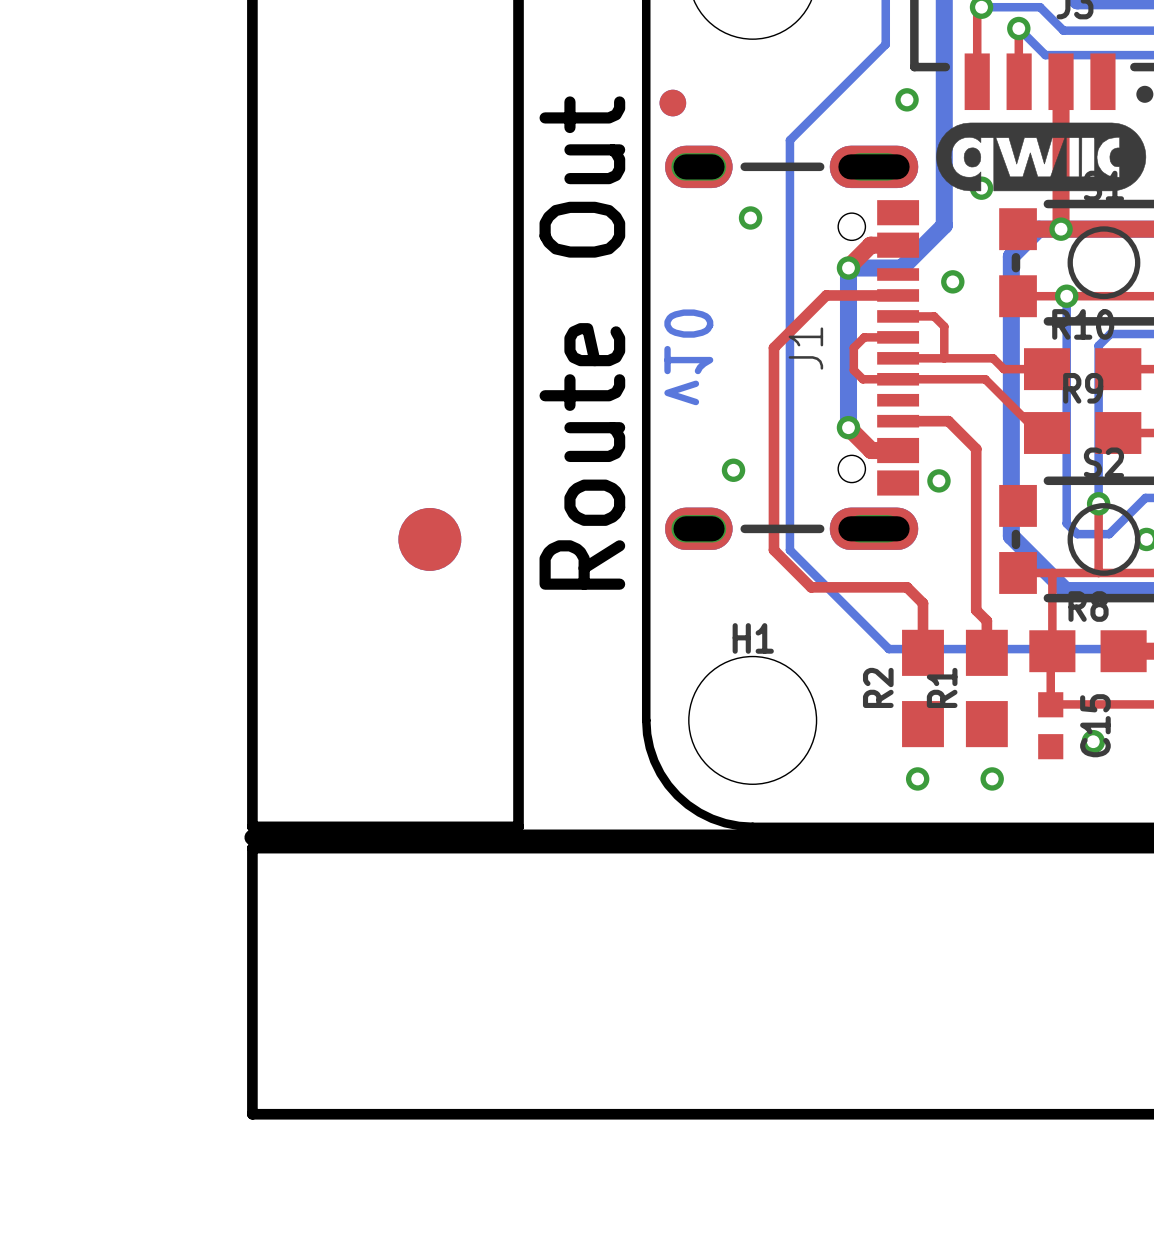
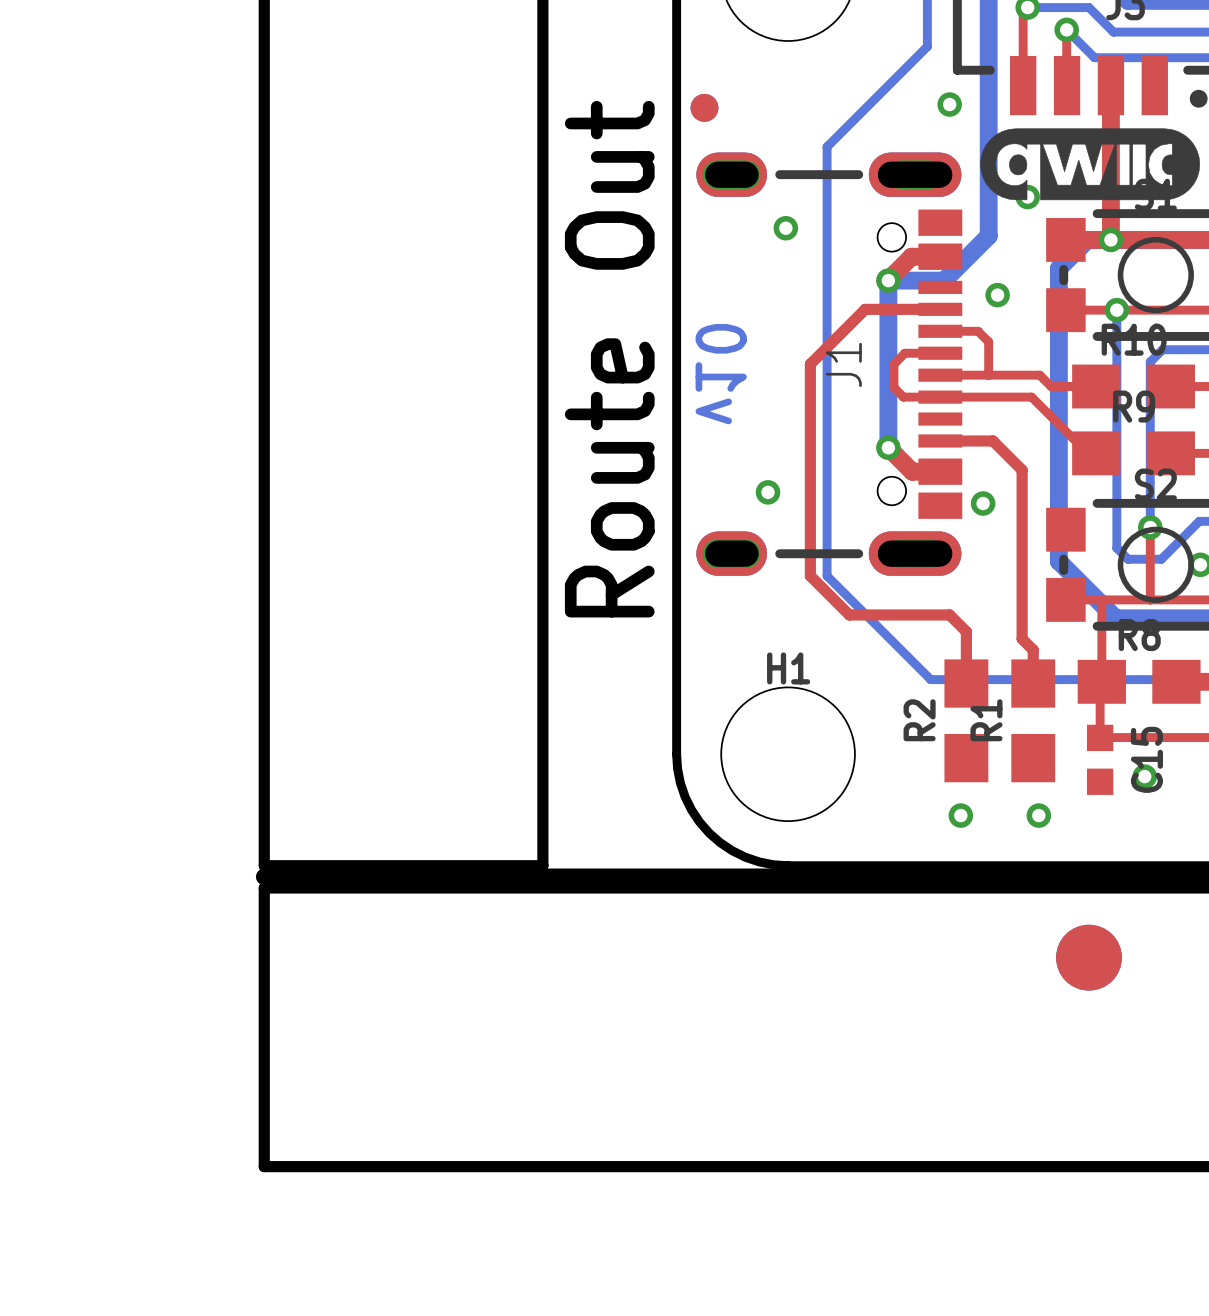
part position: (429, 539) -> (1088, 957)

